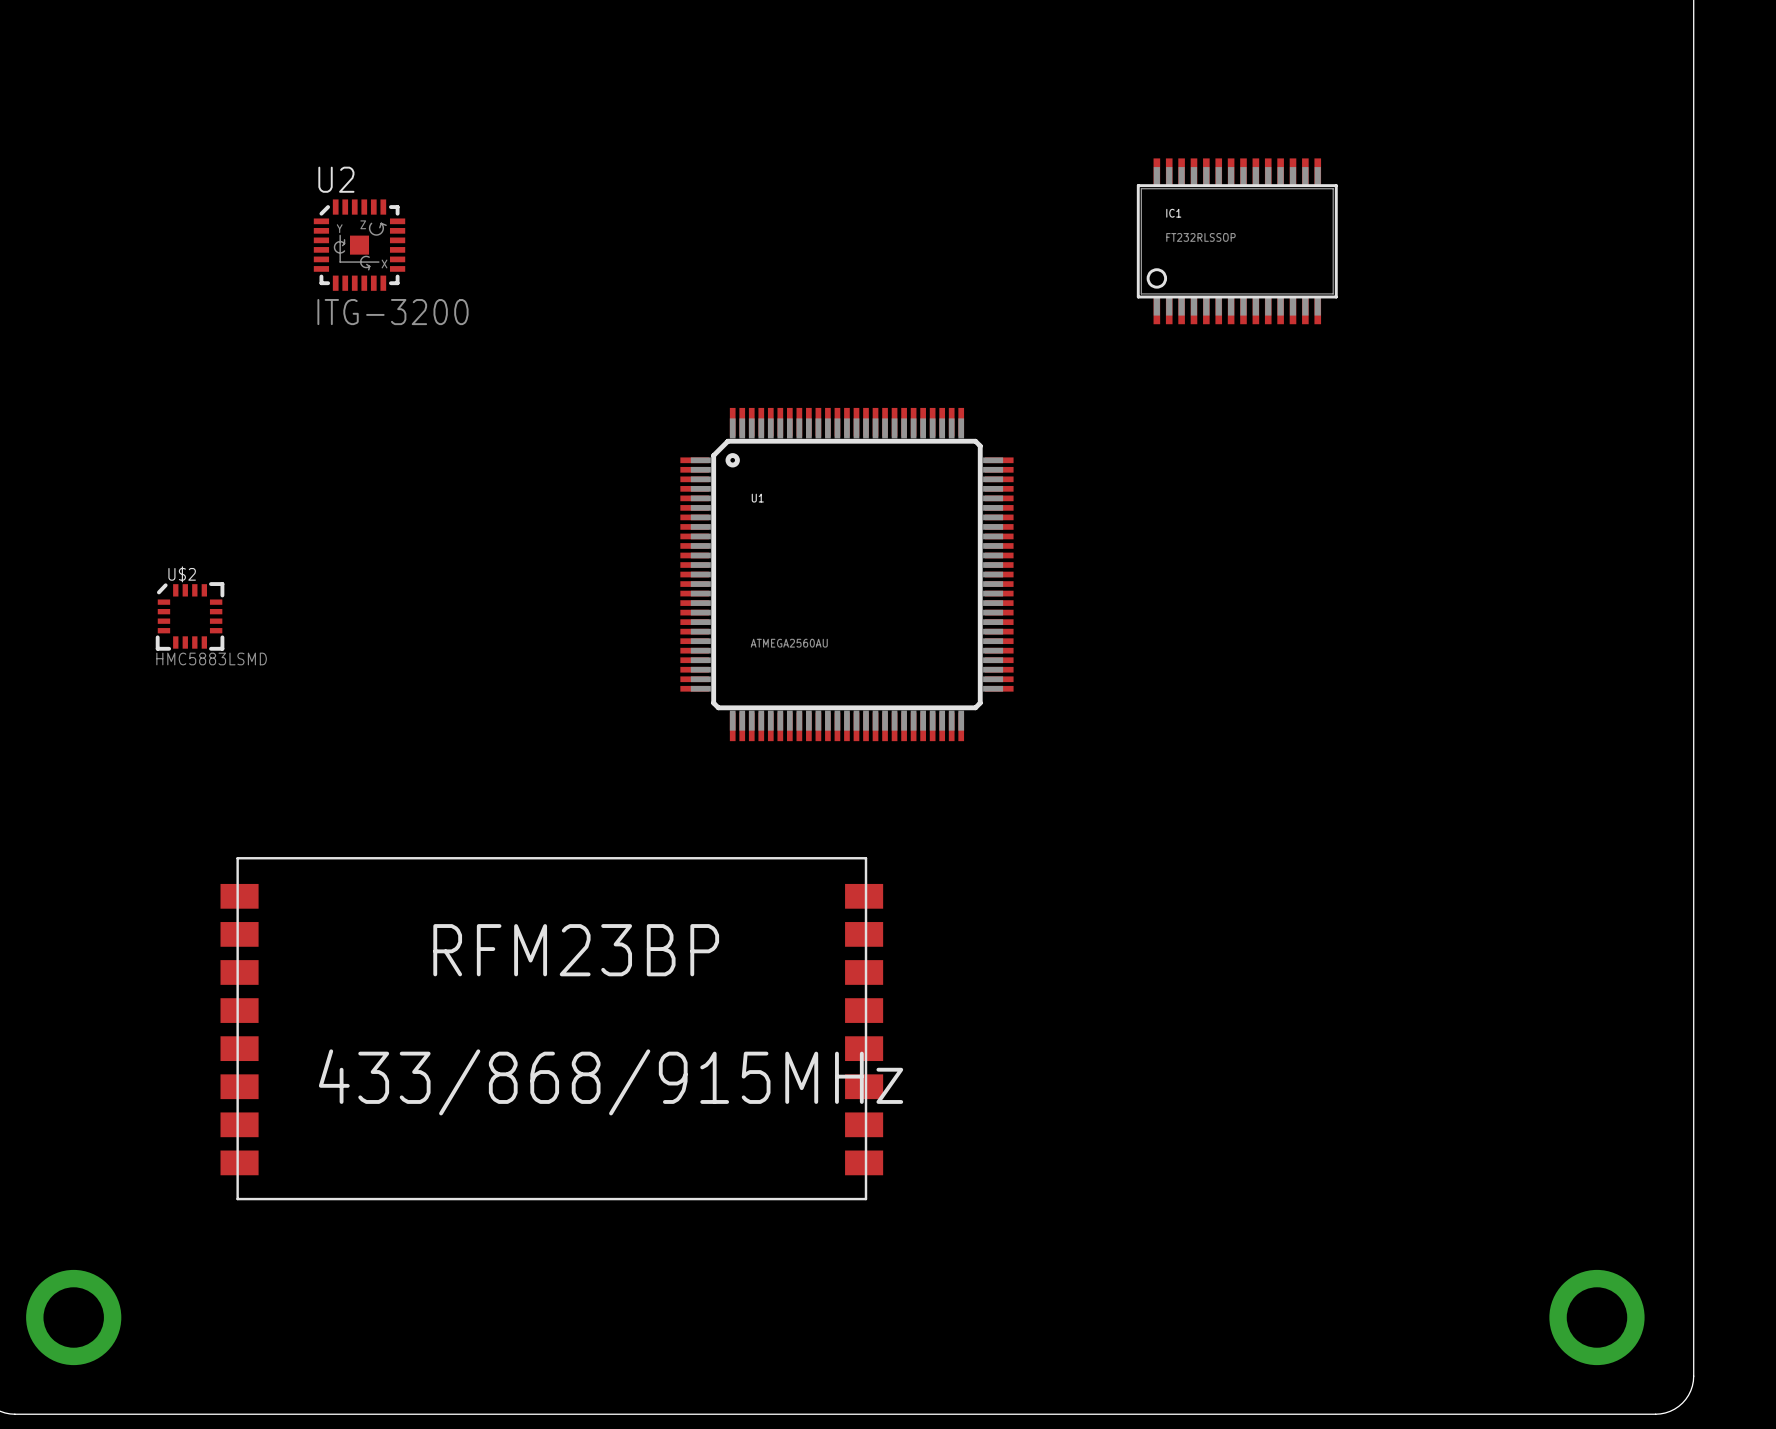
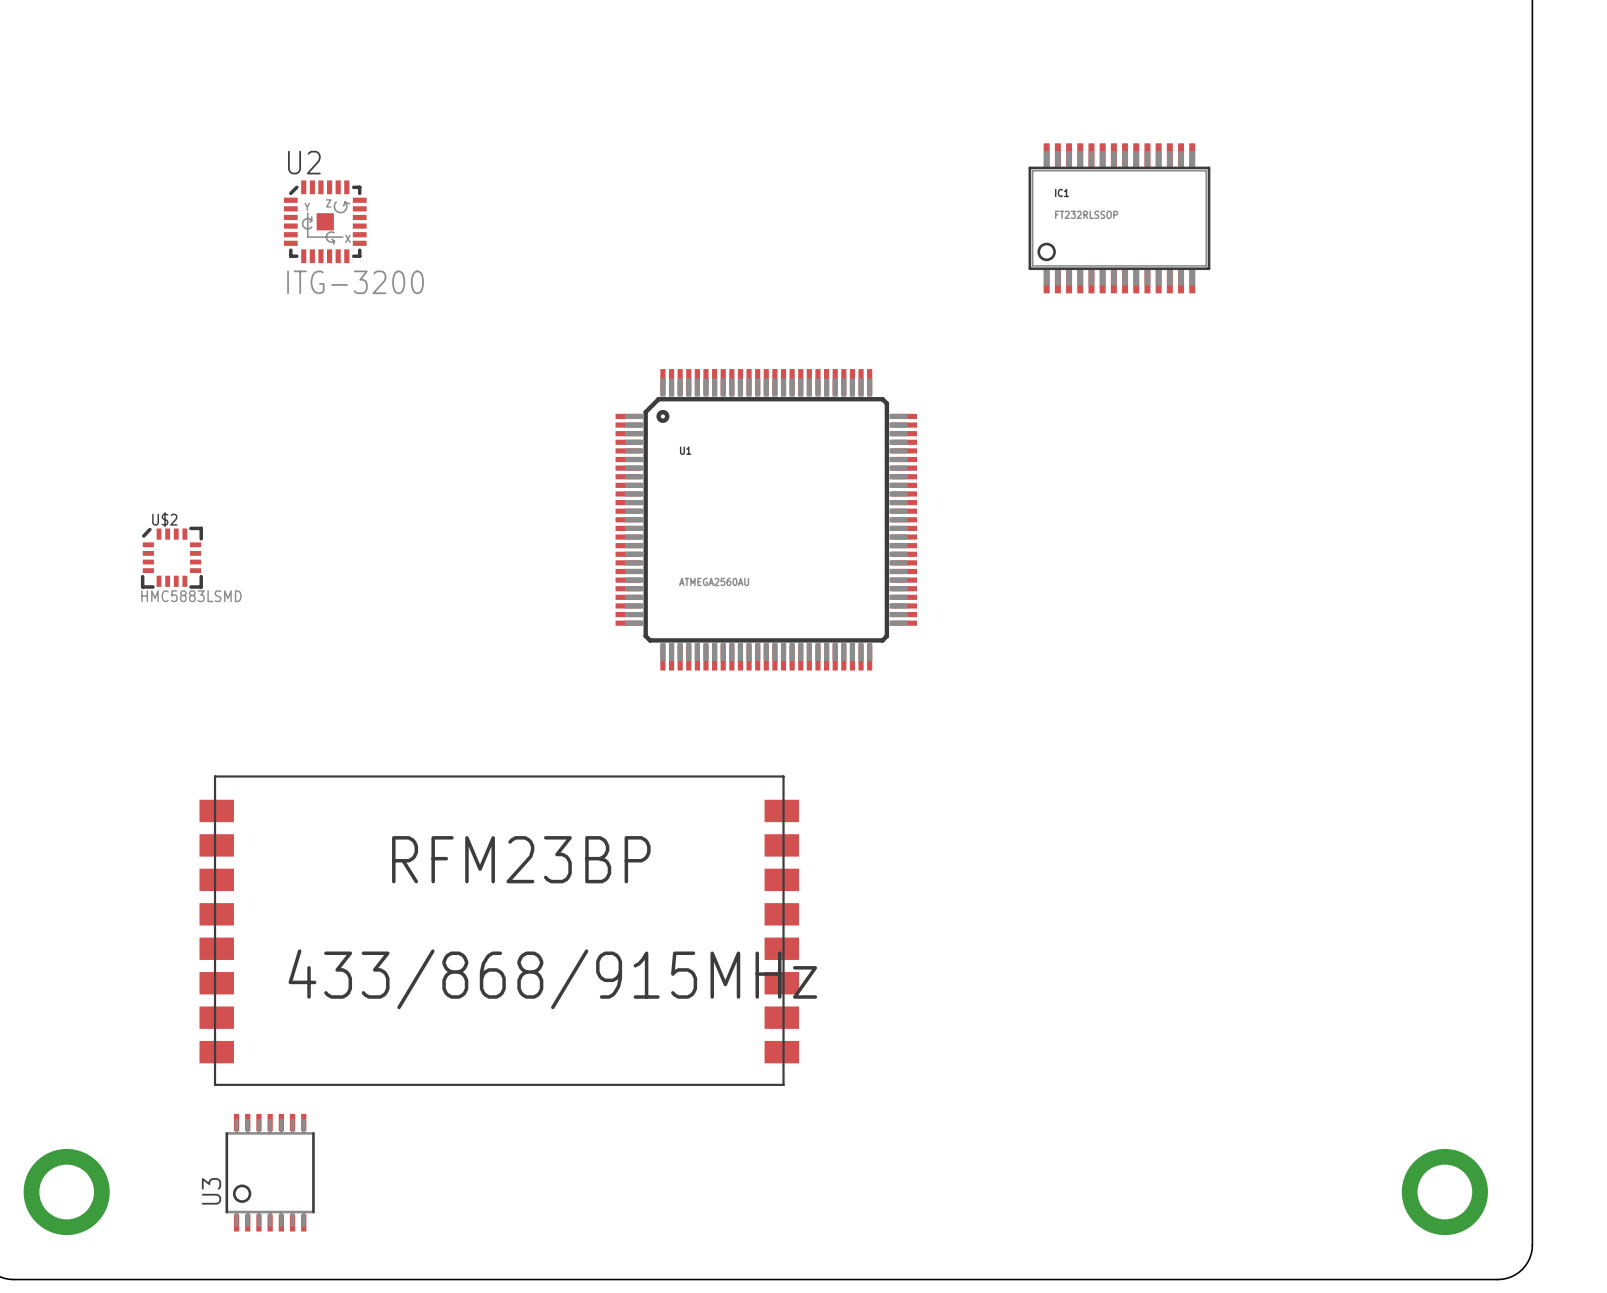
U3: none -> (270, 1172)

